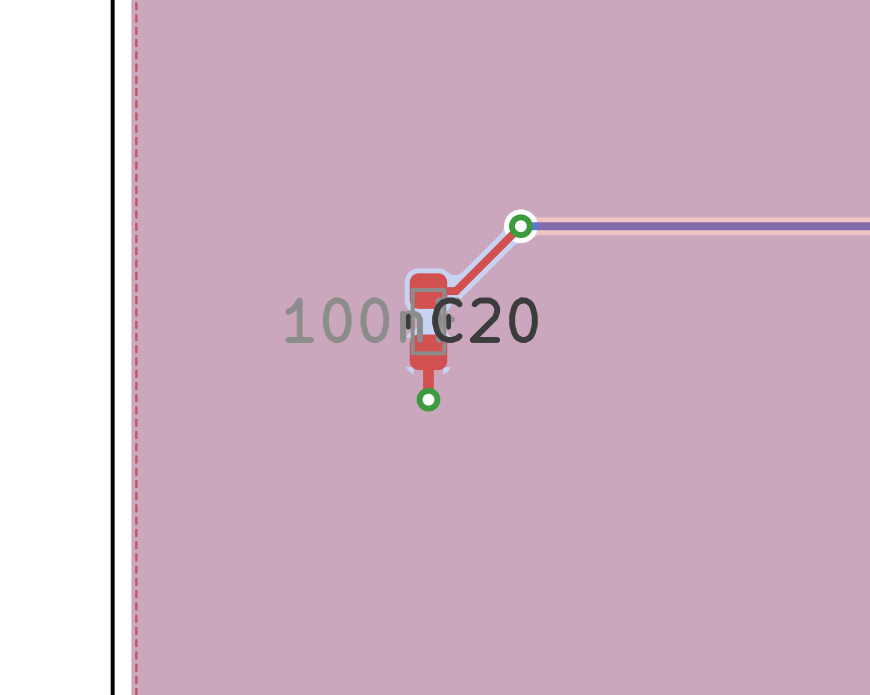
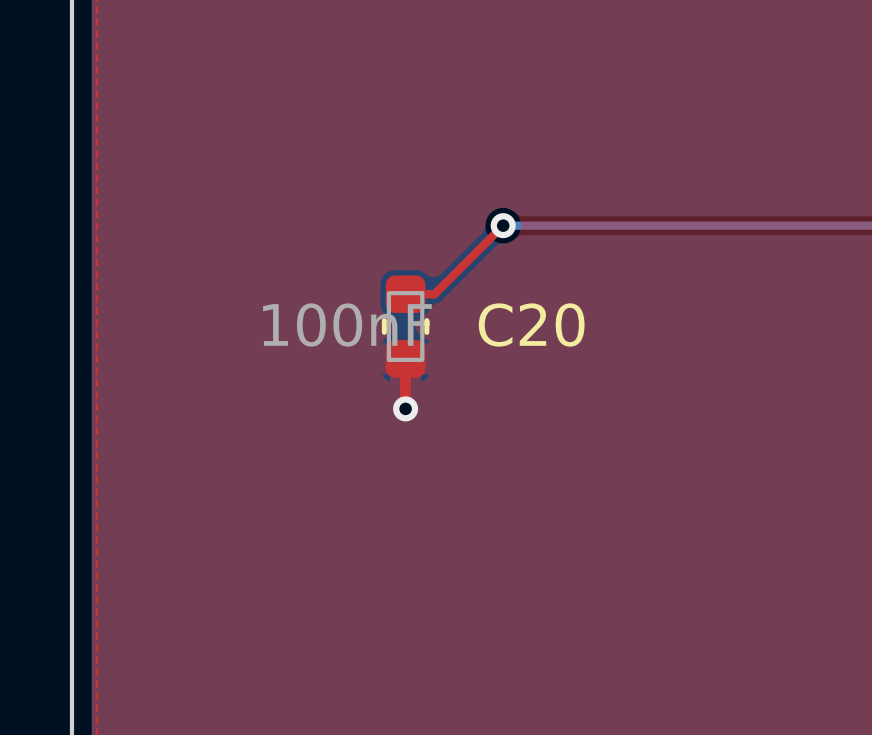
C20 name position: C20 (484, 320) -> C20 (531, 325)

